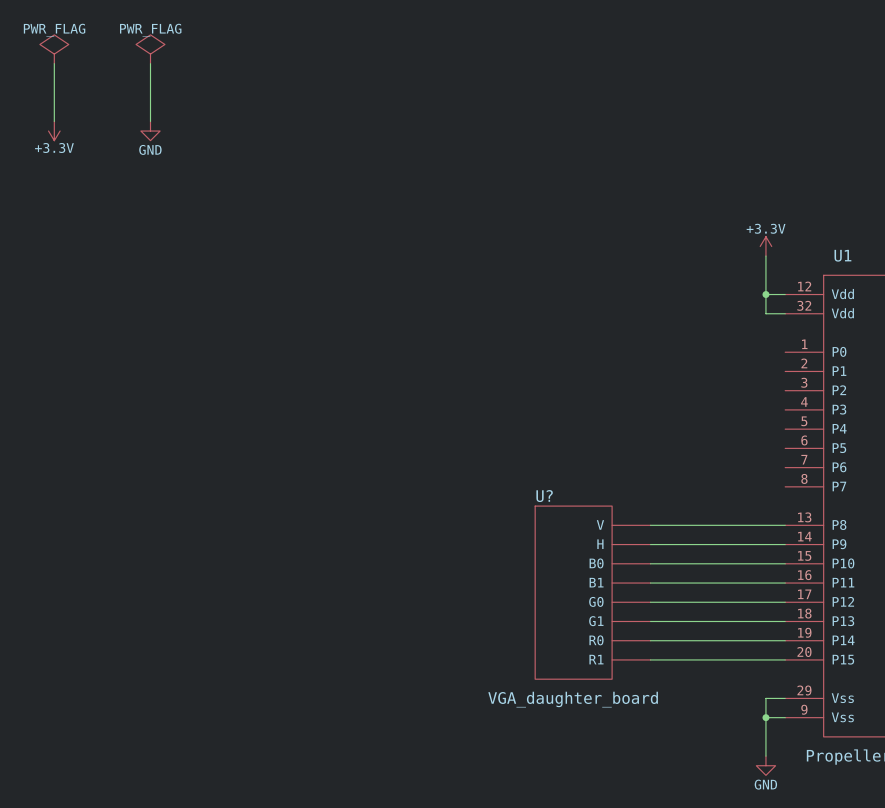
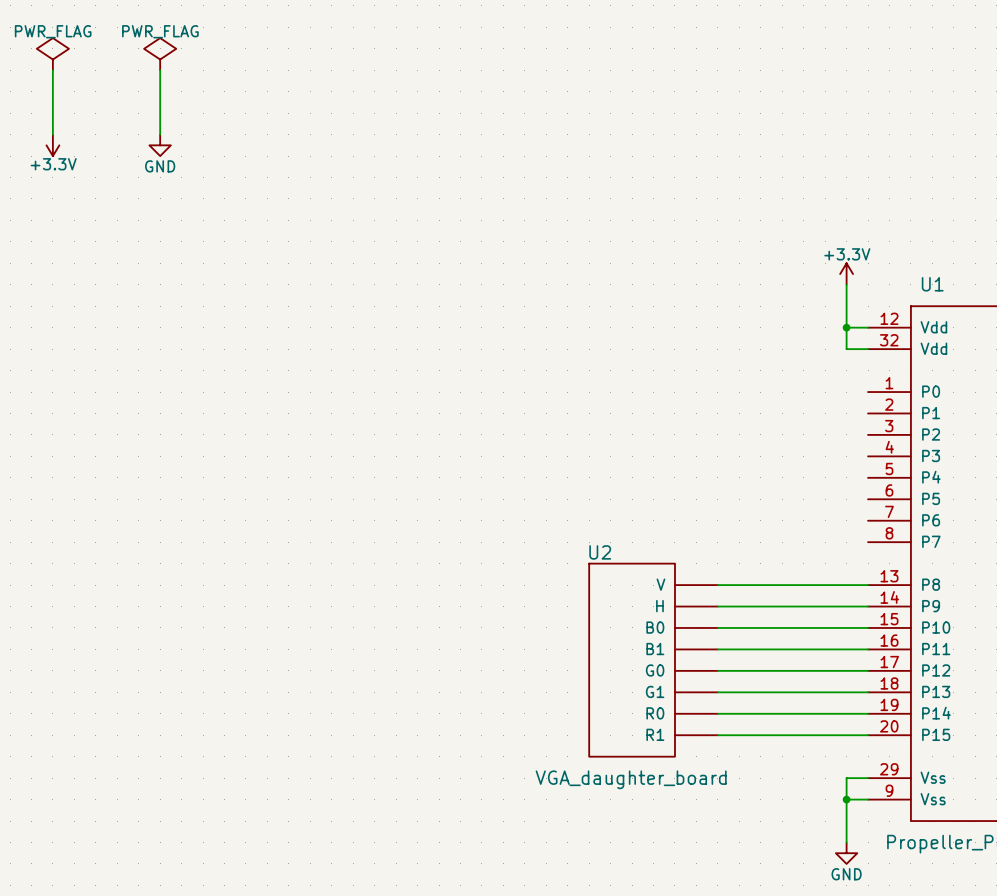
U? name: U? (544, 496) -> U2 (600, 552)

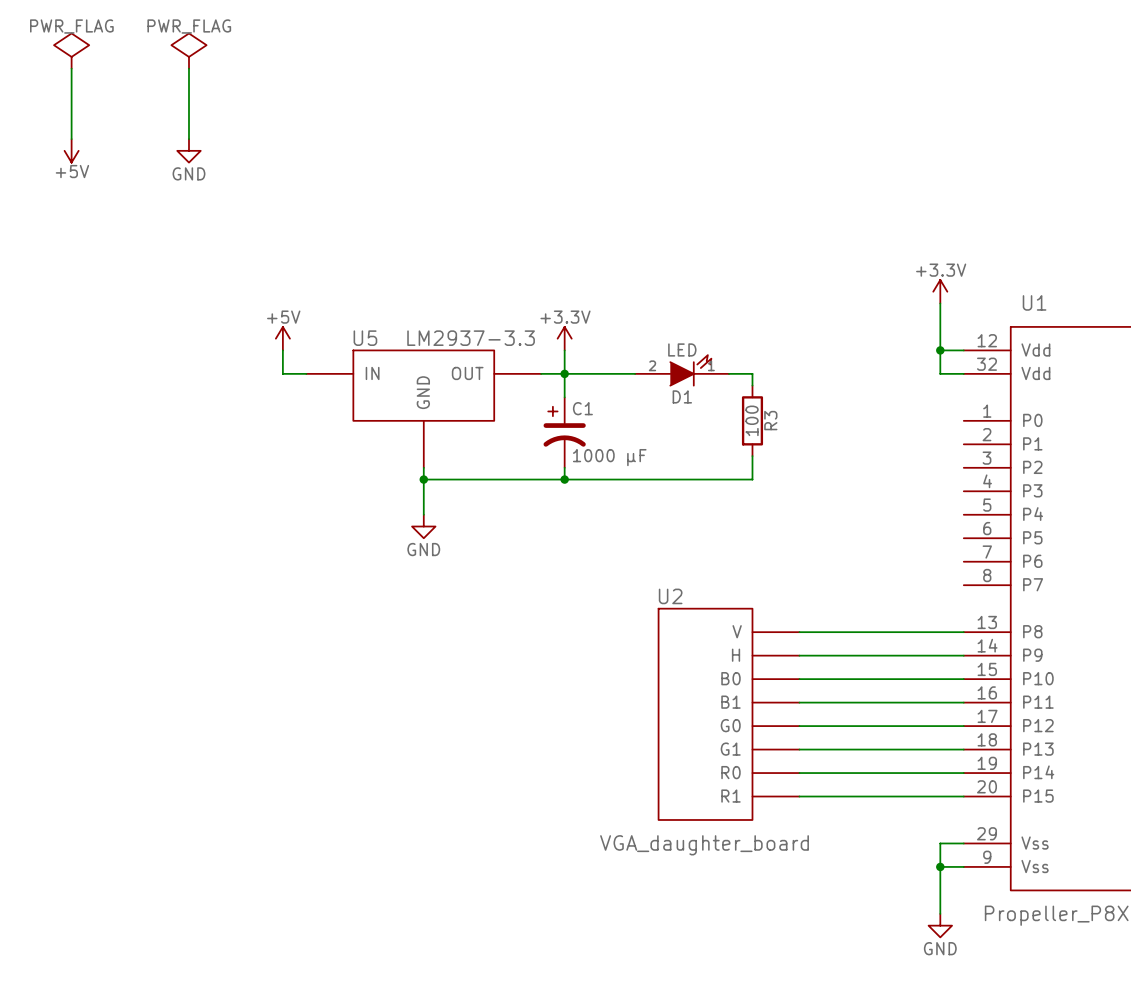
power symbol: +3.3V (52, 145) -> +5V (71, 150)
power symbol: none -> +5V (282, 338)
power symbol: none -> +3.3V (564, 338)
wire: none -> (282, 350) (282, 373) (306, 373)
wire: none -> (564, 350) (564, 397)
D1: none -> LED (682, 370)
wire: none -> (541, 373) (635, 373)
junction: none -> (564, 373)
wire: none -> (729, 373) (752, 373) (752, 385)
U5: none -> LM2937-3.3 (423, 409)
R3: none -> 100 (752, 420)
C1: none -> 1000 µF (564, 432)
wire: none -> (752, 456) (752, 479) (423, 479)
wire: none -> (423, 467) (423, 514)
wire: none -> (564, 467) (564, 479)
junction: none -> (423, 479)
junction: none -> (564, 479)
power symbol: none -> GND (423, 526)

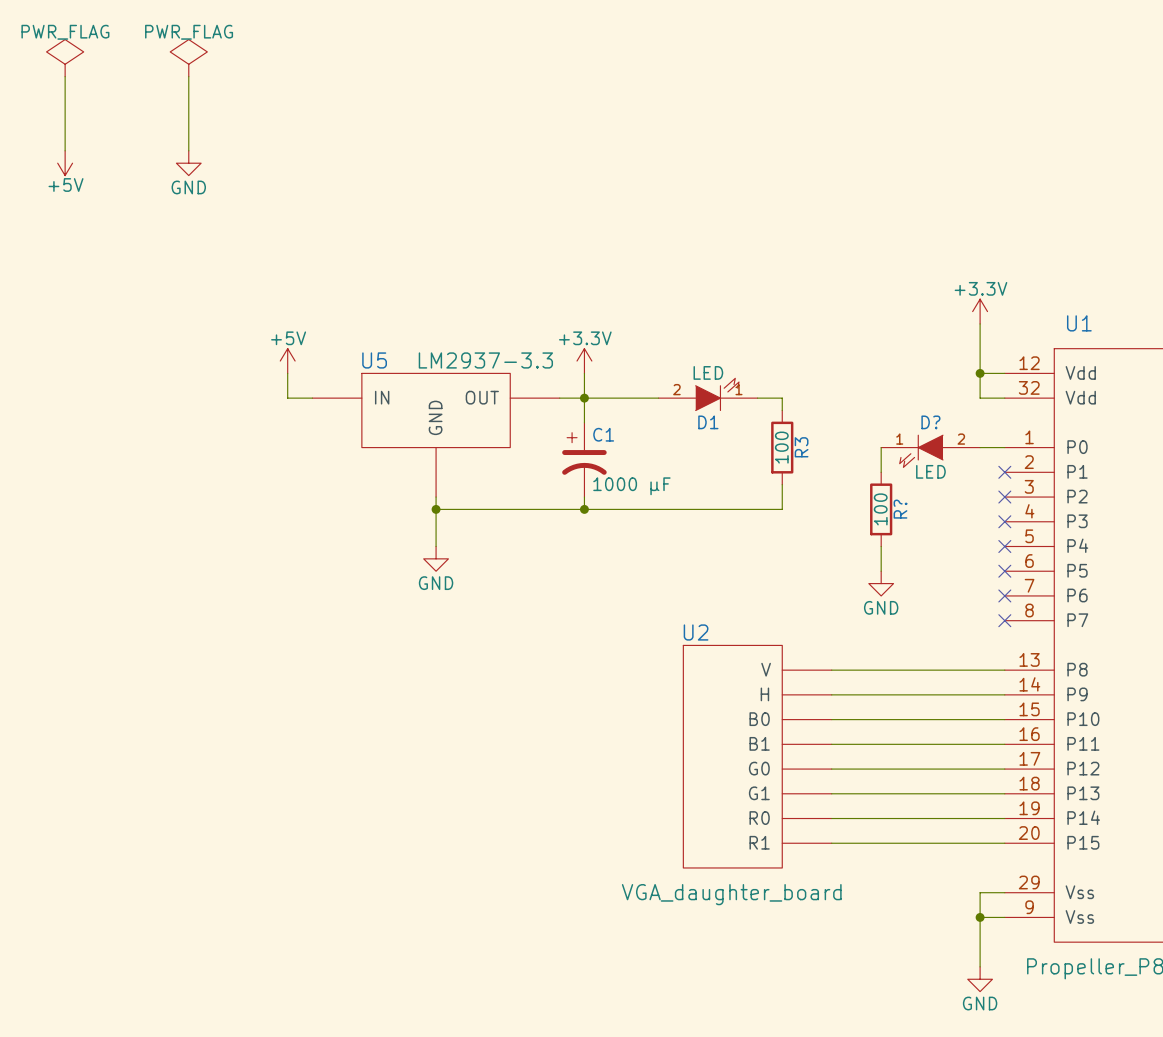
wire: none -> (881, 447) (881, 472)
wire: none -> (980, 447) (1004, 447)
D?: none -> LED (930, 451)
no-connect mark: none -> (1004, 472)
no-connect mark: none -> (1004, 497)
R?: none -> 100 (881, 509)
no-connect mark: none -> (1004, 521)
wire: none -> (881, 546) (881, 571)
no-connect mark: none -> (1004, 546)
no-connect mark: none -> (1004, 571)
power symbol: none -> GND (881, 583)
no-connect mark: none -> (1004, 595)
no-connect mark: none -> (1004, 620)

